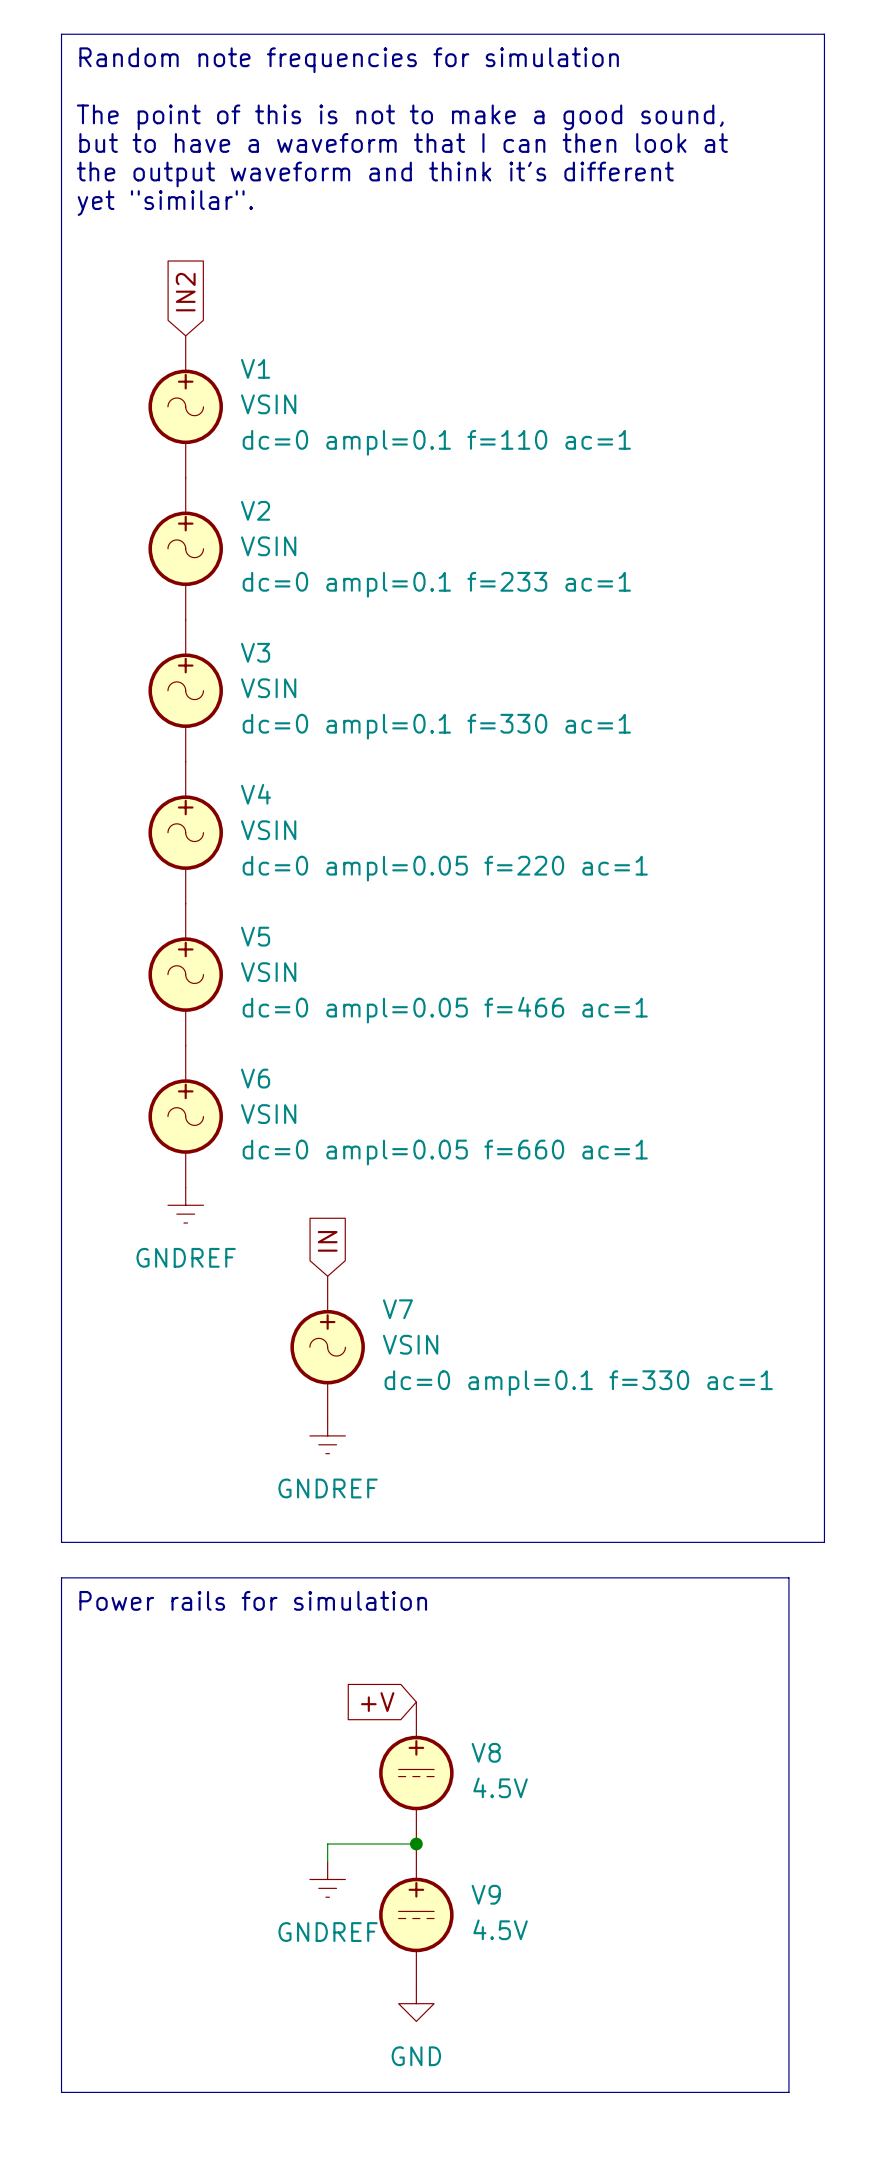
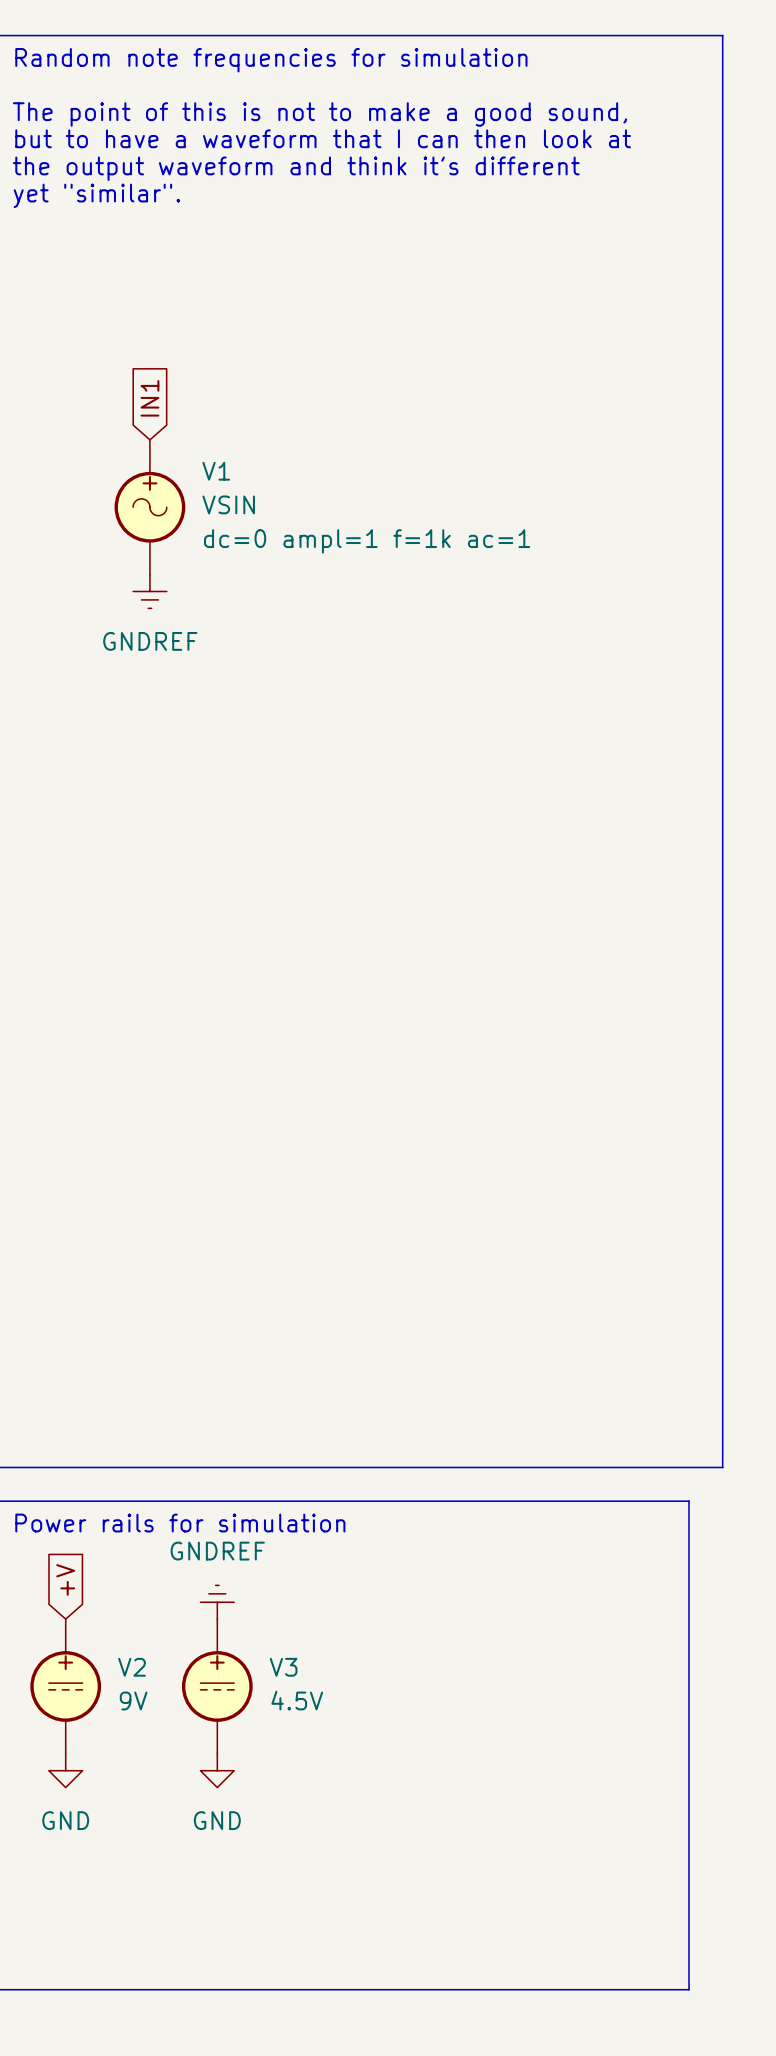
global label: IN2 (185, 292) -> none
V1 position: (185, 406) -> (149, 507)
global label: none -> IN1 (149, 398)
V1 text: dc=0 ampl=0.1 f=110 ac=1 (436, 442) -> dc=0 ampl=1 f=1k ac=1 (367, 541)
V2 symbol: [148, 477, 223, 620] -> [30, 1619, 102, 1754]
V2 value: VSIN (268, 546) -> 9V (133, 1700)
V2 text: dc=0 ampl=0.1 f=233 ac=1 (436, 584) -> none
V3 symbol: [148, 619, 223, 762] -> [181, 1619, 253, 1754]
power symbol: none -> GNDREF (149, 591)
V3 value: VSIN (268, 688) -> 4.5V (297, 1700)
V3 text: dc=0 ampl=0.1 f=330 ac=1 (436, 726) -> none
V4: VSIN (185, 832) -> none
V5: VSIN (185, 974) -> none
V6: VSIN (185, 1116) -> none
power symbol: GNDREF (185, 1205) -> none
global label: IN (327, 1241) -> none
V7: VSIN (327, 1347) -> none
power symbol: GNDREF (327, 1435) -> none
power symbol: none -> GNDREF (217, 1602)
global label rotation: 0° (377, 1702) -> 90° clockwise (65, 1579)
global label position: +V (377, 1702) -> +V (65, 1579)
V8: 4.5V (416, 1773) -> none
wire: (416, 1844) (327, 1844) (327, 1861) -> none
junction: (416, 1844) -> none
power symbol: none -> GND (65, 1770)
power symbol: none -> GND (217, 1770)
power symbol: GNDREF (327, 1879) -> none
V9: 4.5V (416, 1914) -> none
power symbol: GND (416, 2003) -> none

